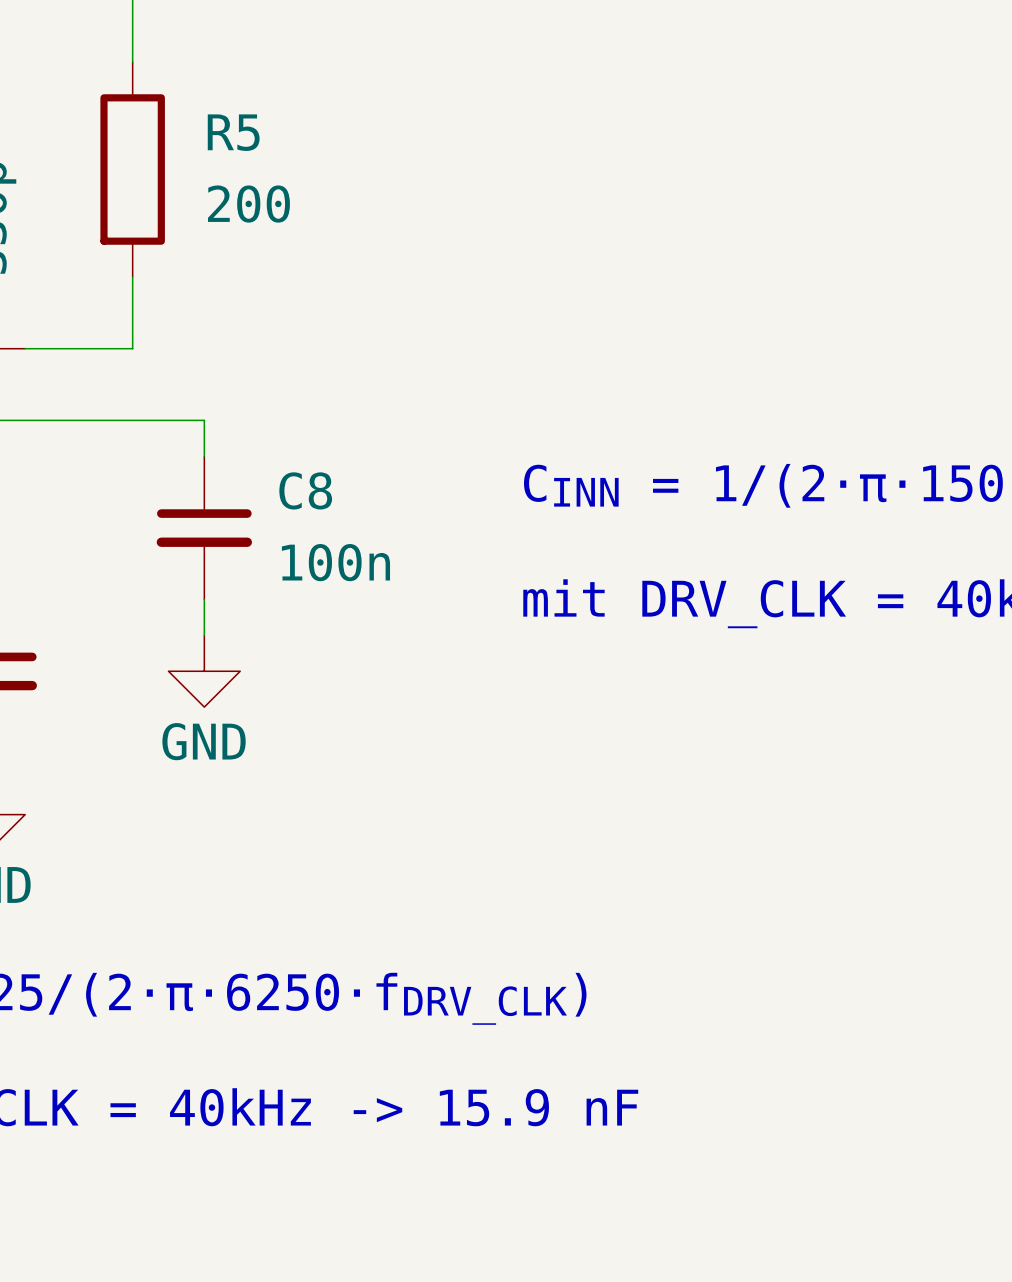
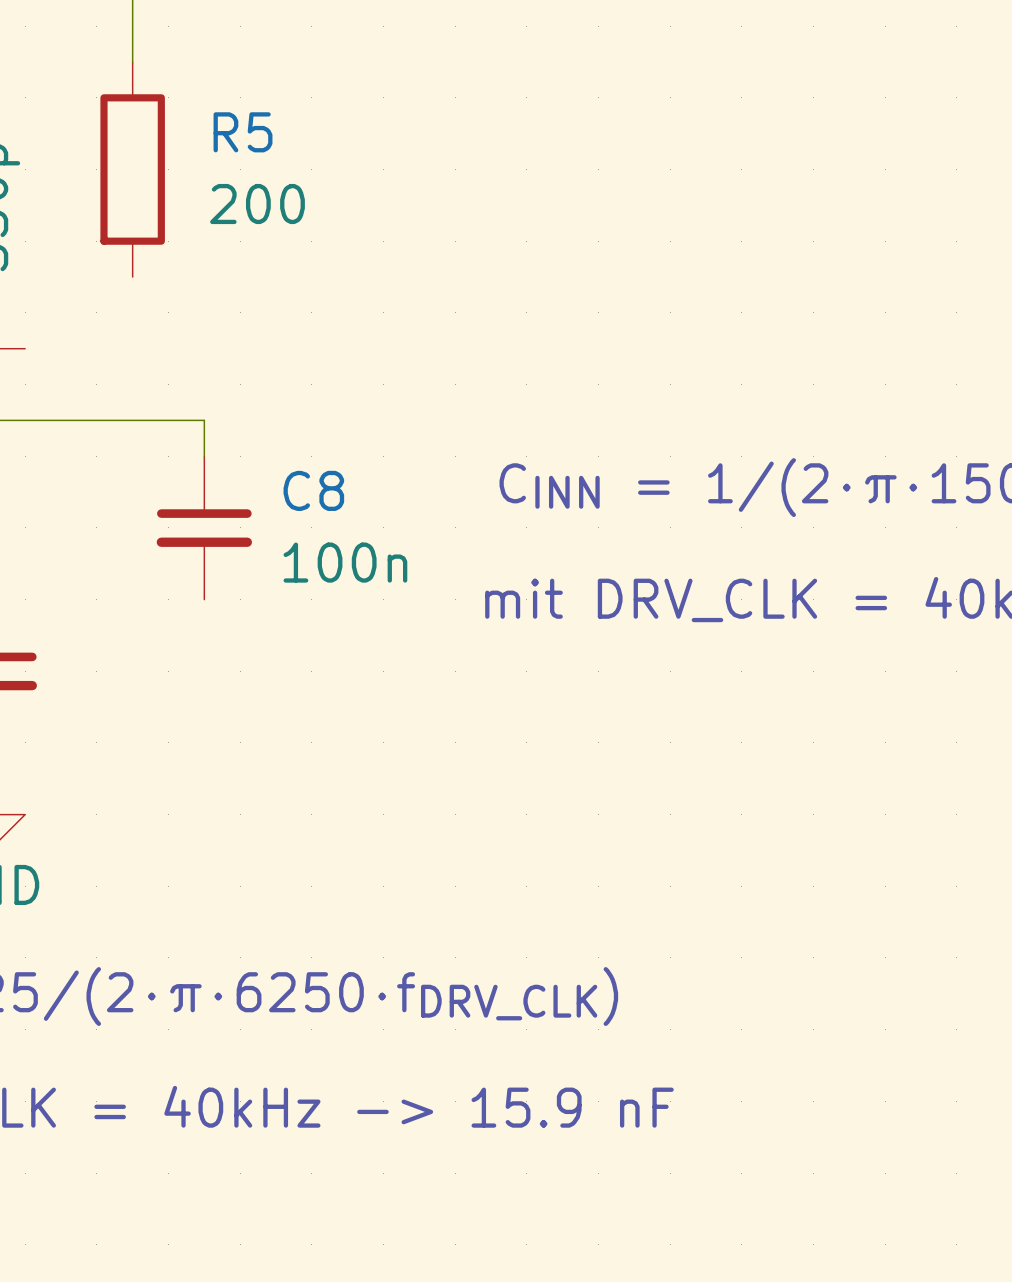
wire: (132, 277) (132, 348) (25, 348) -> none
wire: (204, 599) (204, 635) -> none
power symbol: GND (204, 671) -> none

